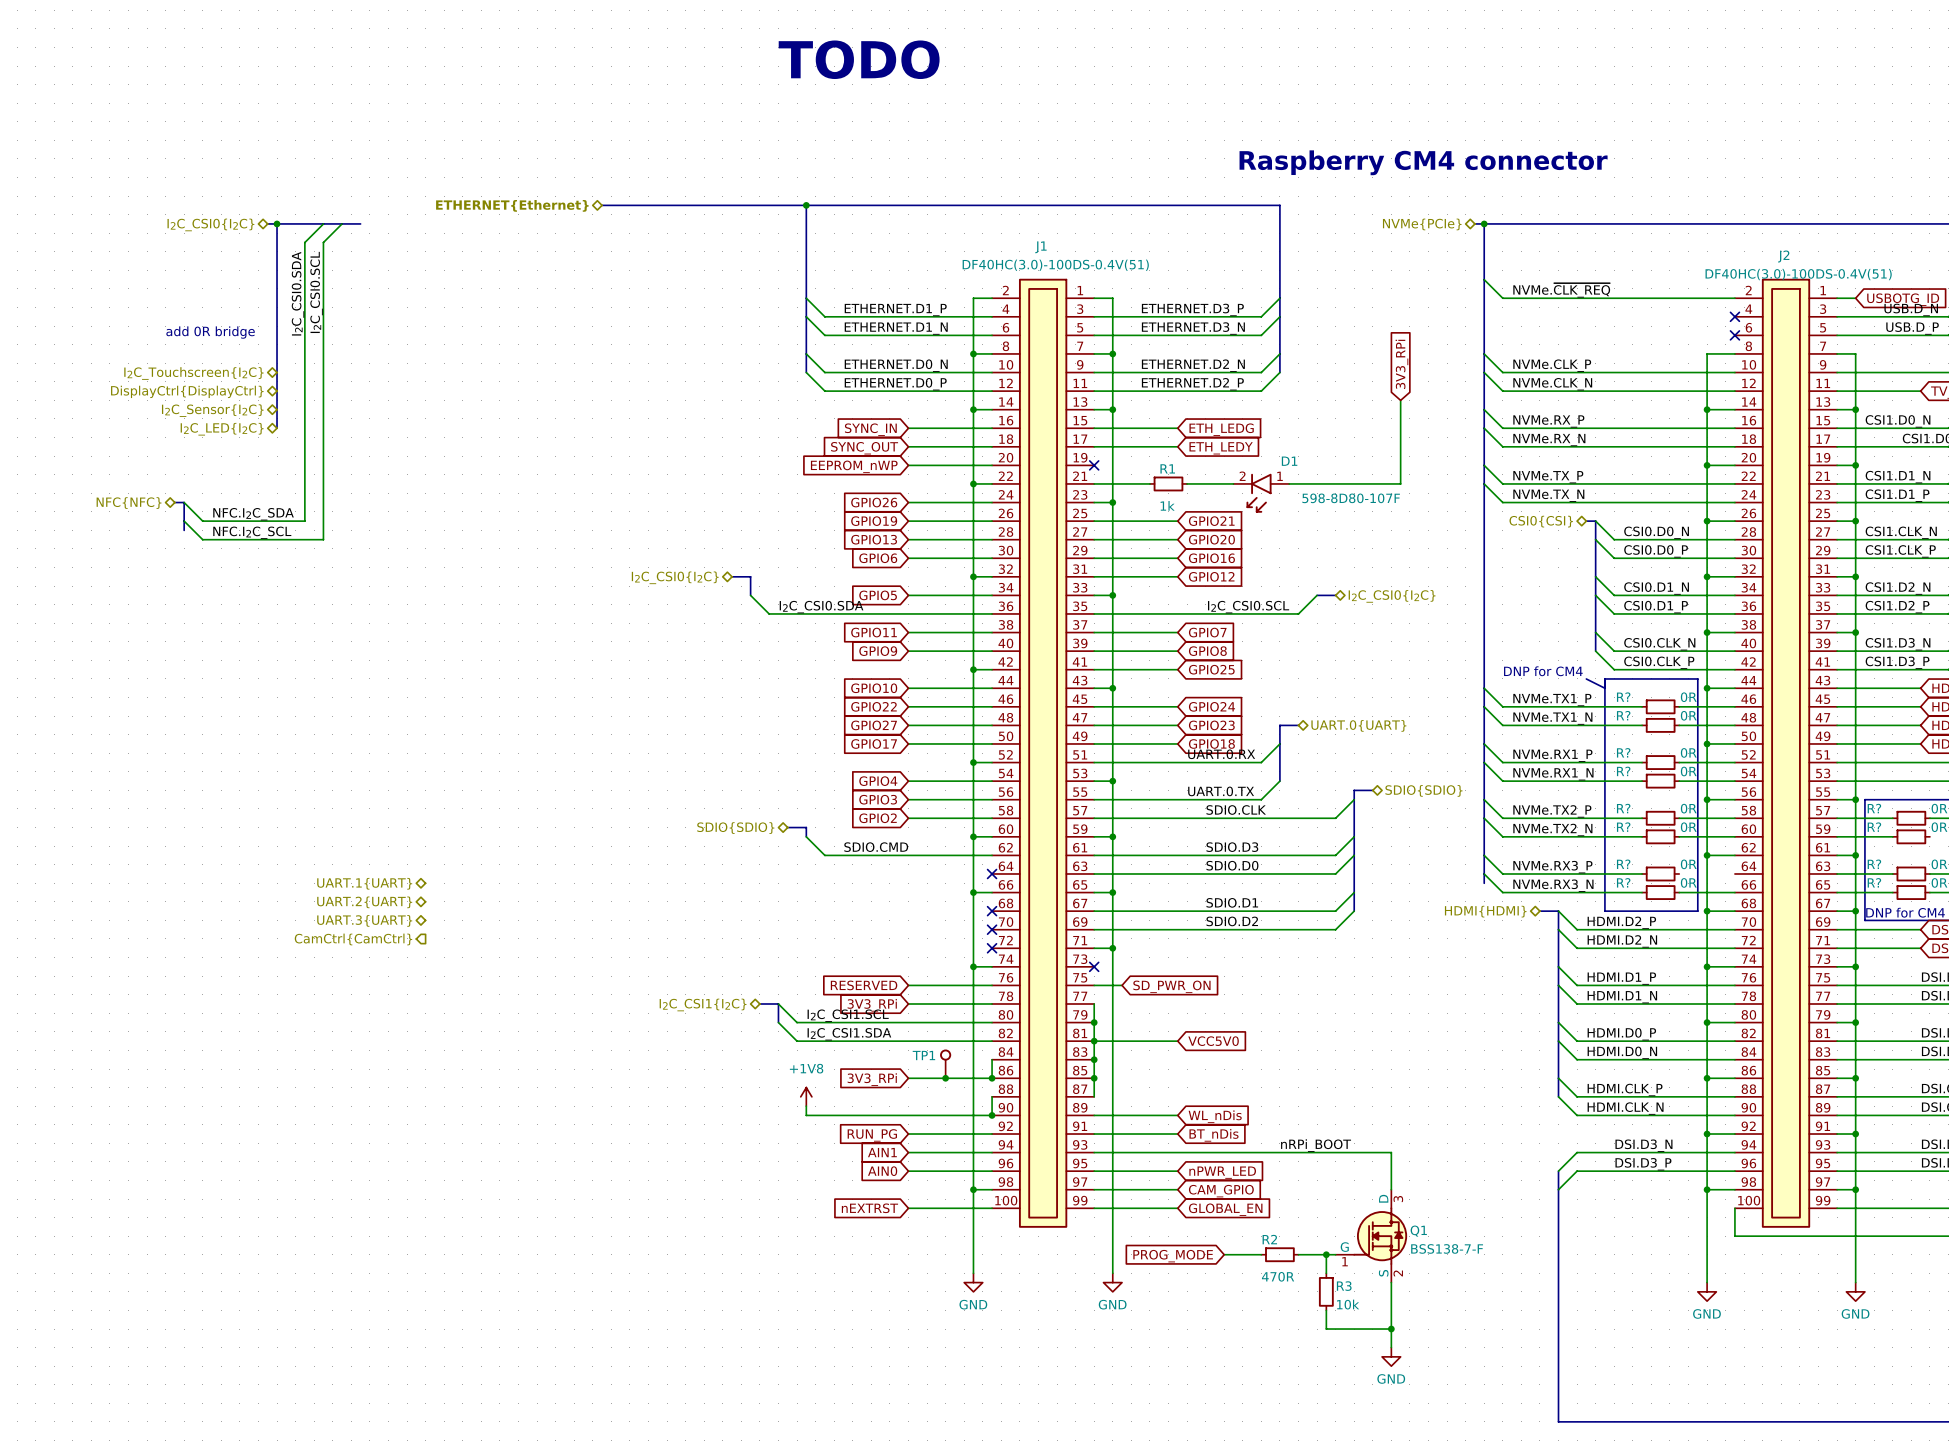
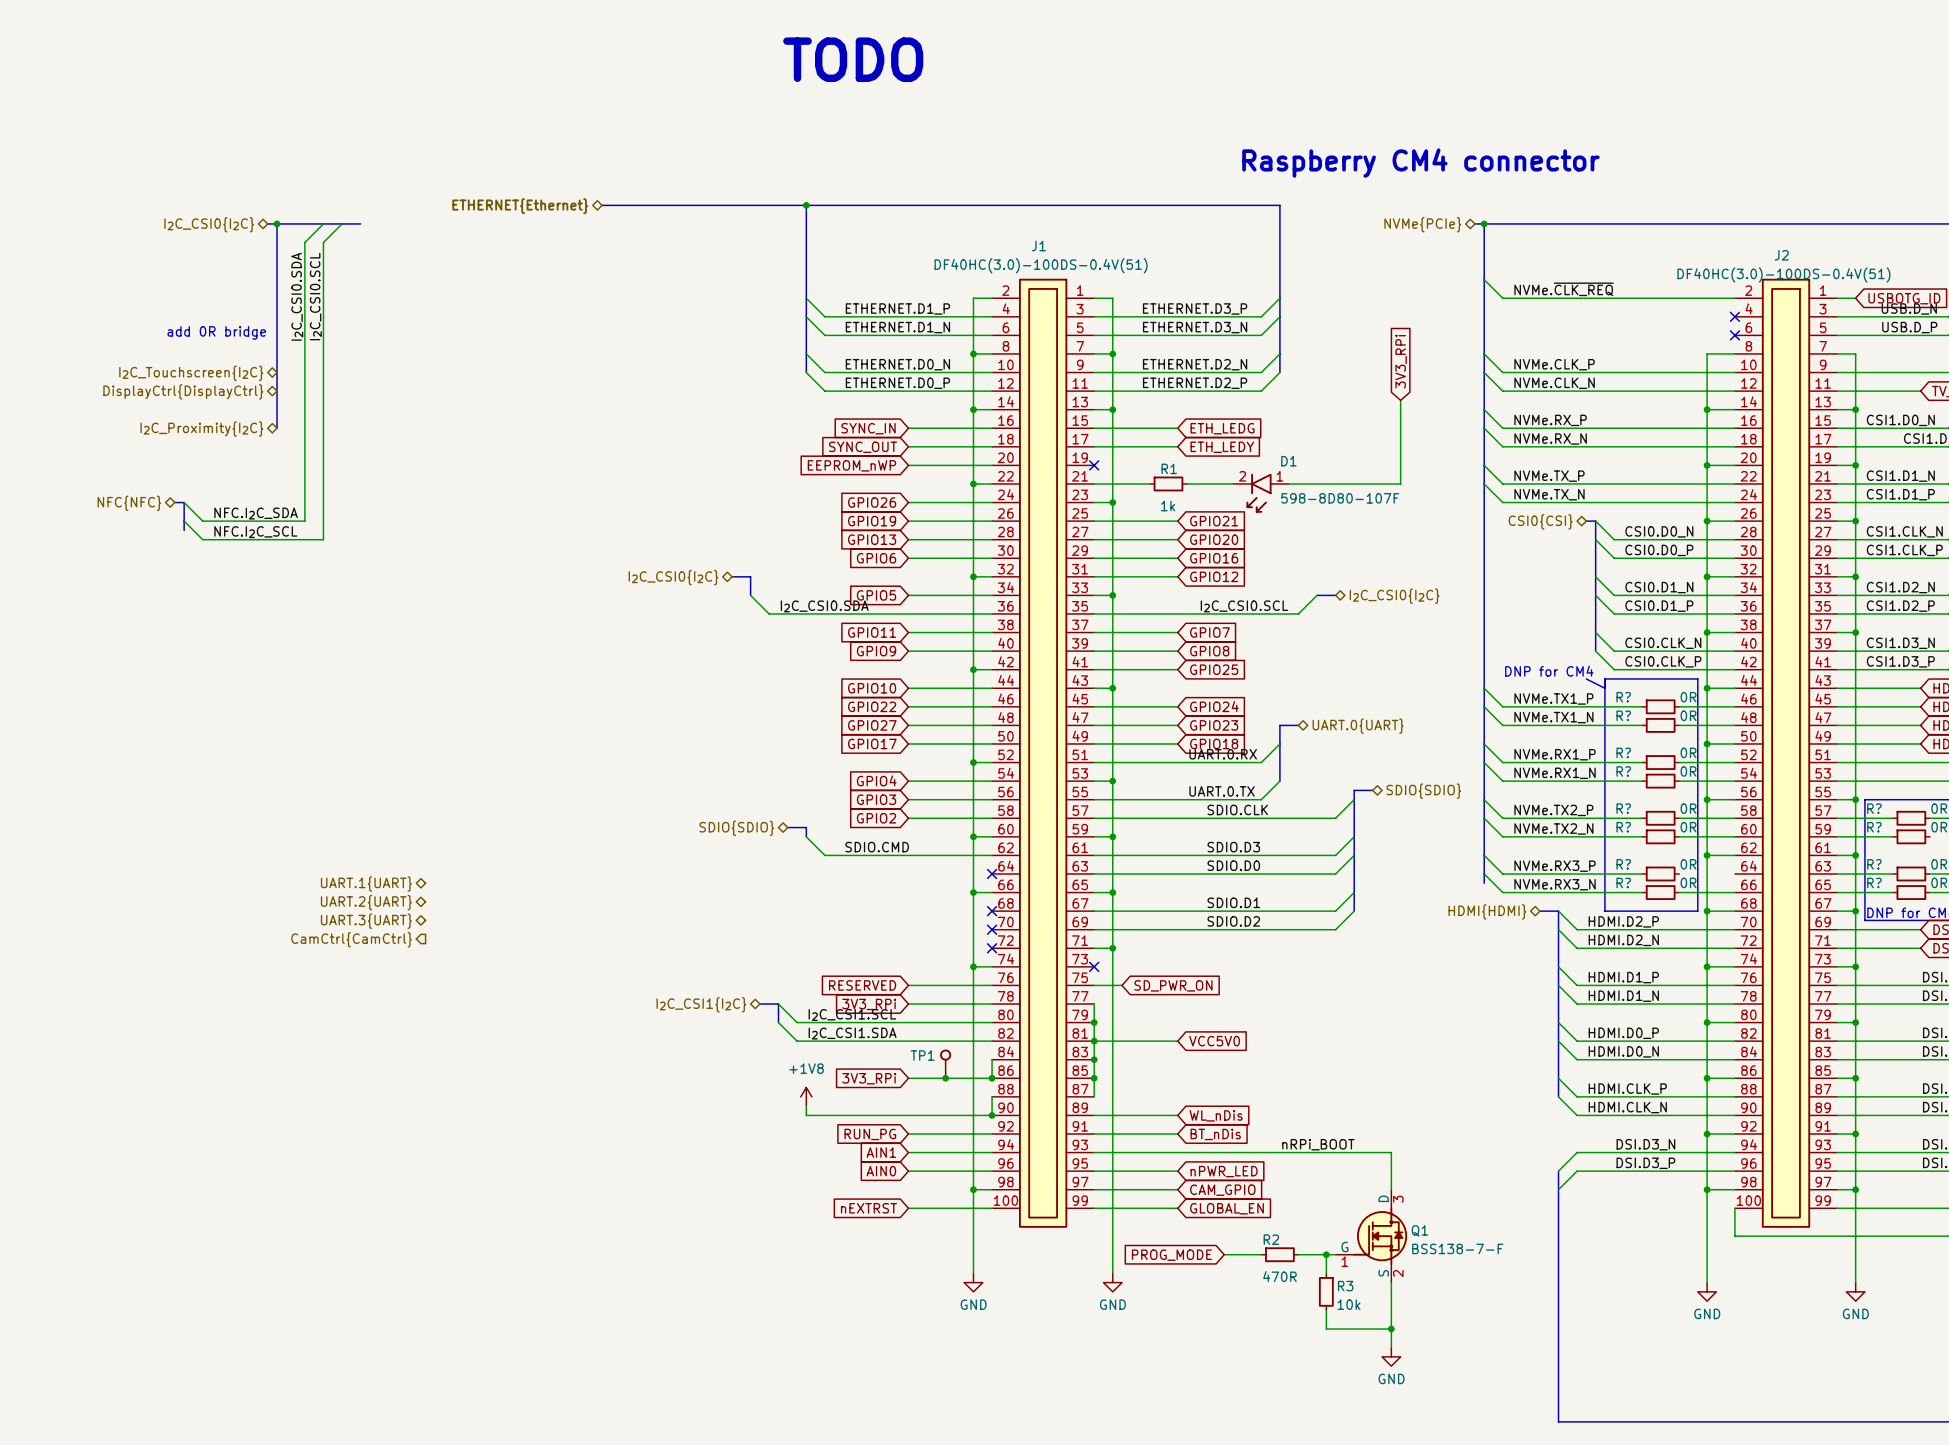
hierarchical label: I2C_Sensor{I2C} (212, 410) -> none
hierarchical label: I2C_LED{I2C} (222, 429) -> I2C_Proximity{I2C} (201, 429)

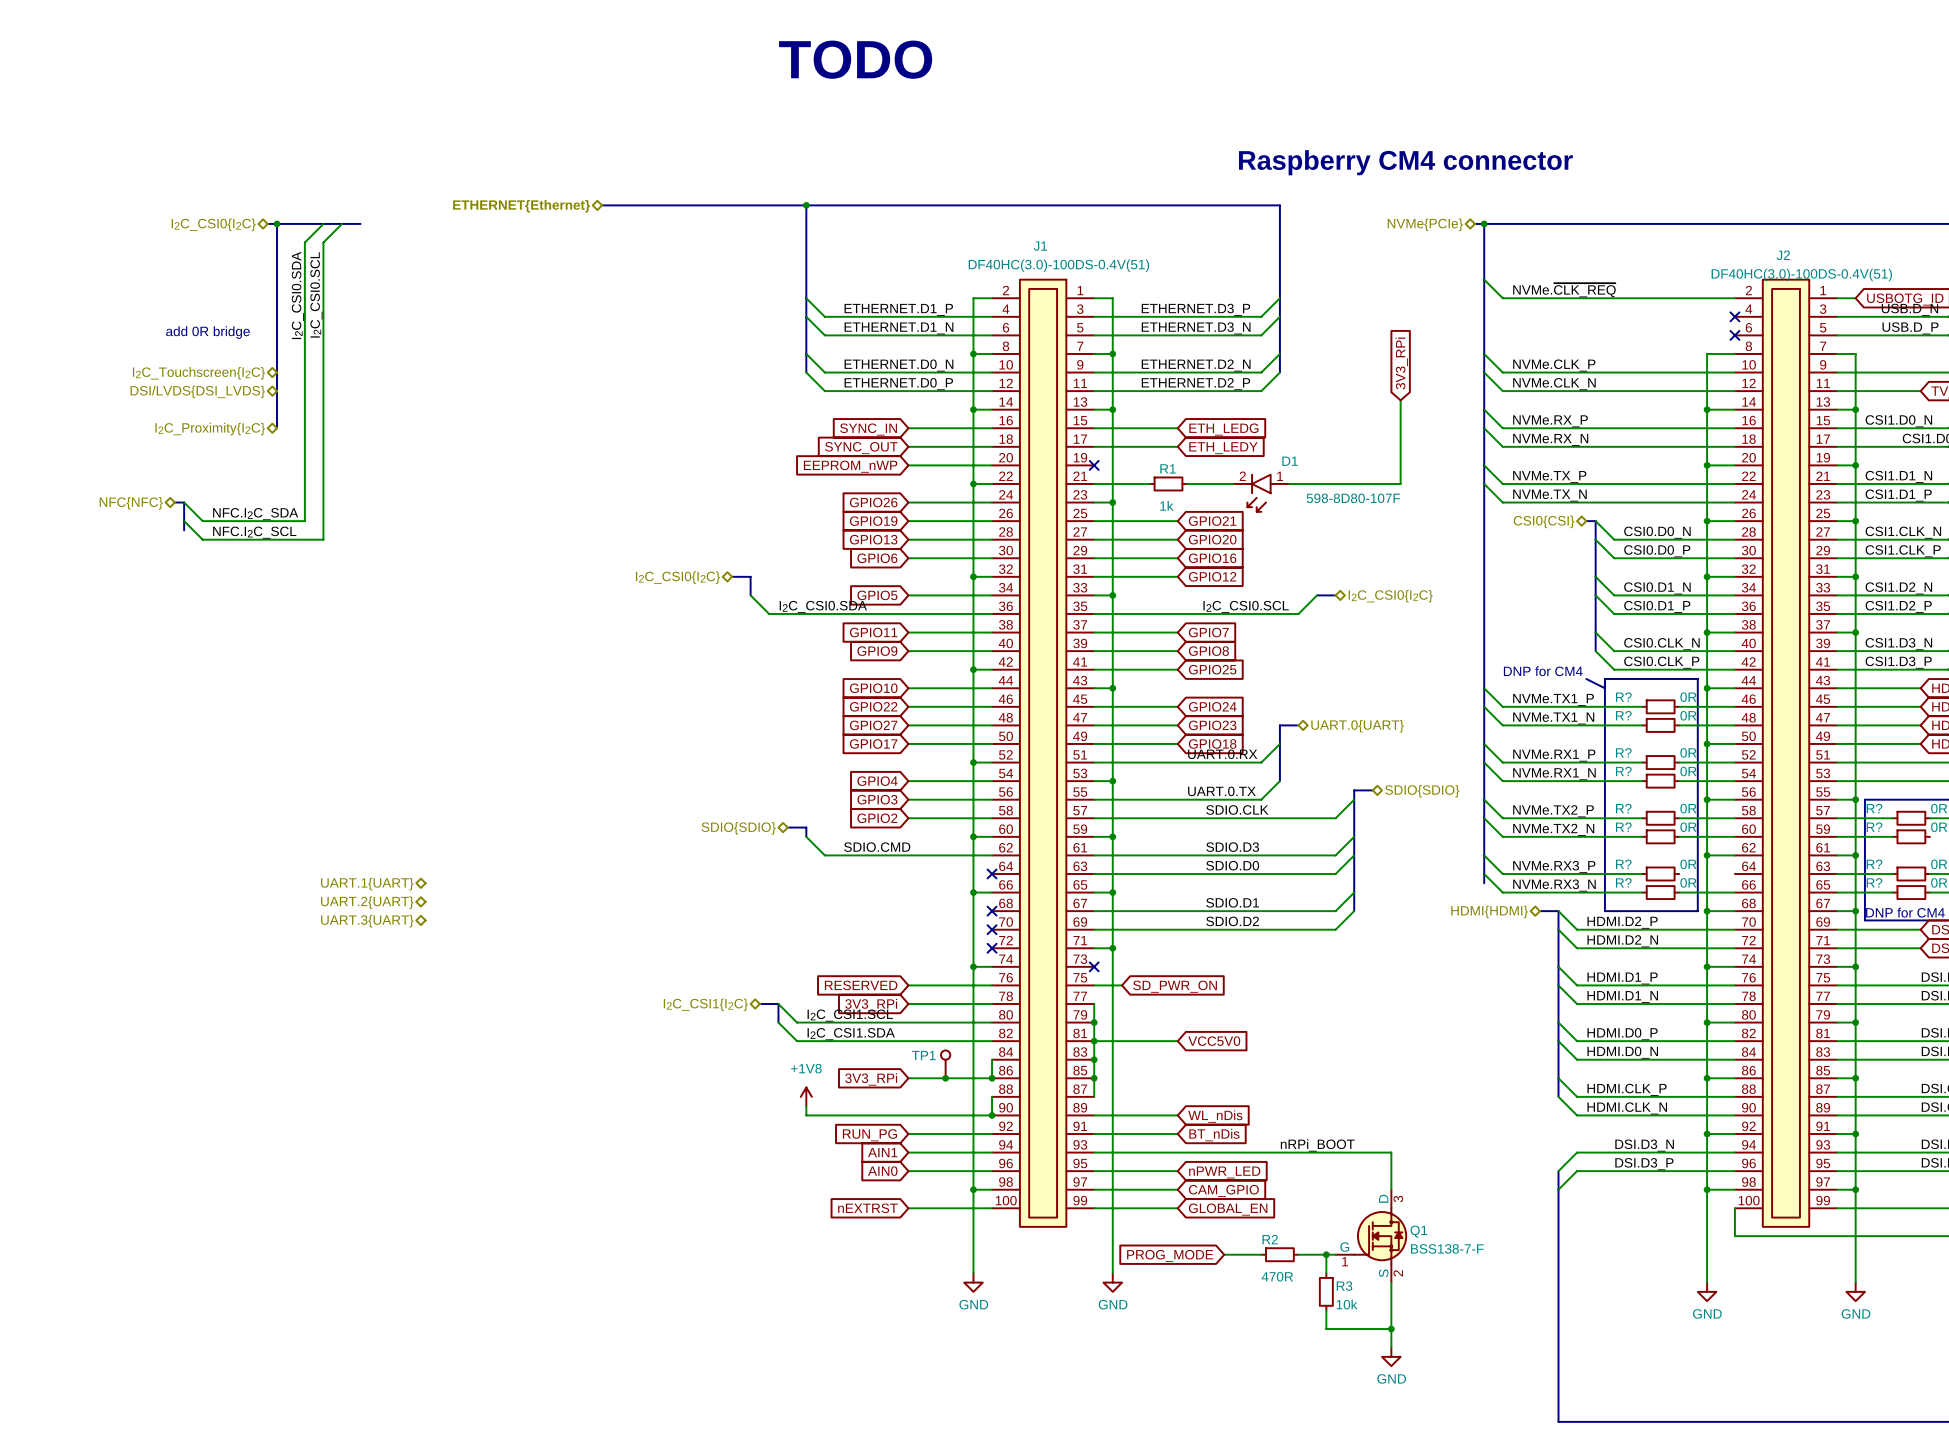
hierarchical label: DisplayCtrl{DisplayCtrl} (183, 391) -> DSI/LVDS{DSI_LVDS} (197, 391)
hierarchical label: CamCtrl{CamCtrl} (351, 939) -> none

